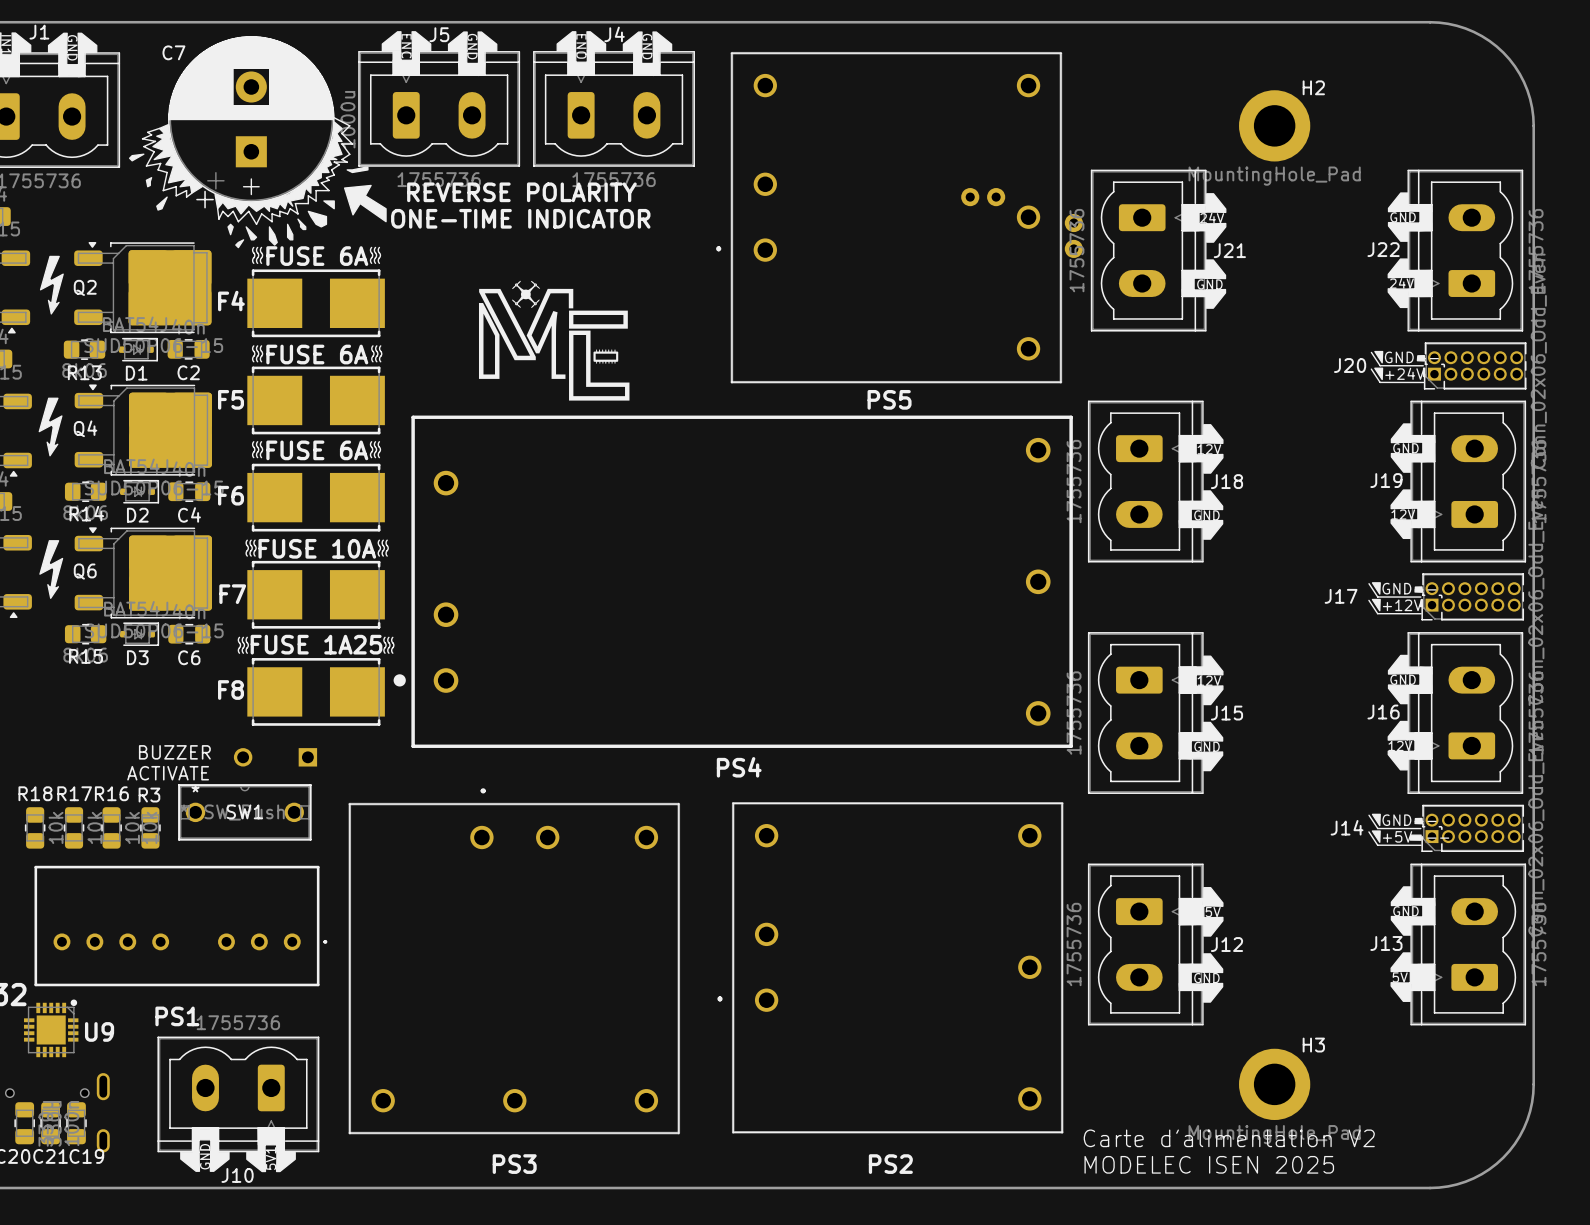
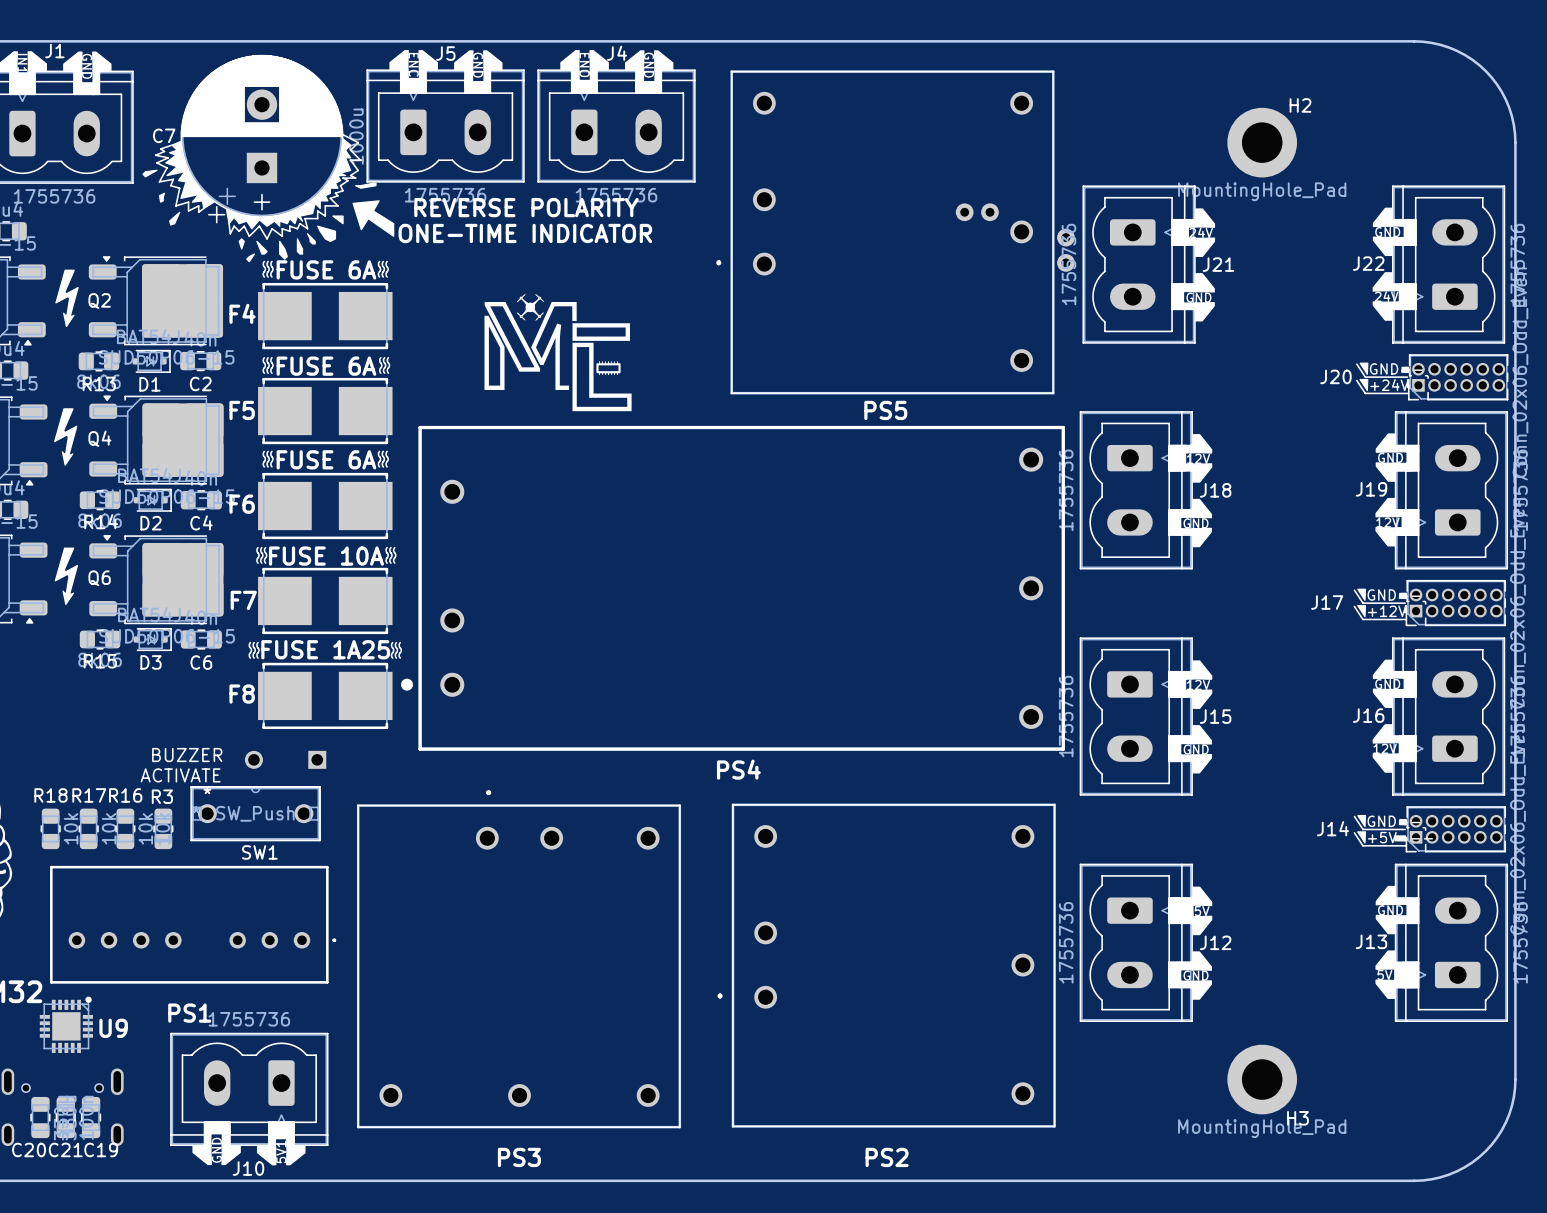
C7 name position: C7 (173, 52) -> C7 (164, 135)
SW1 name position: SW1 (244, 811) -> SW1 (259, 852)
H3 name position: H3 (1313, 1045) -> H3 (1297, 1118)
text: Carte d'alimentation V2 (1229, 1138) -> none
text: MODELEC ISEN 2025 (1209, 1164) -> none

